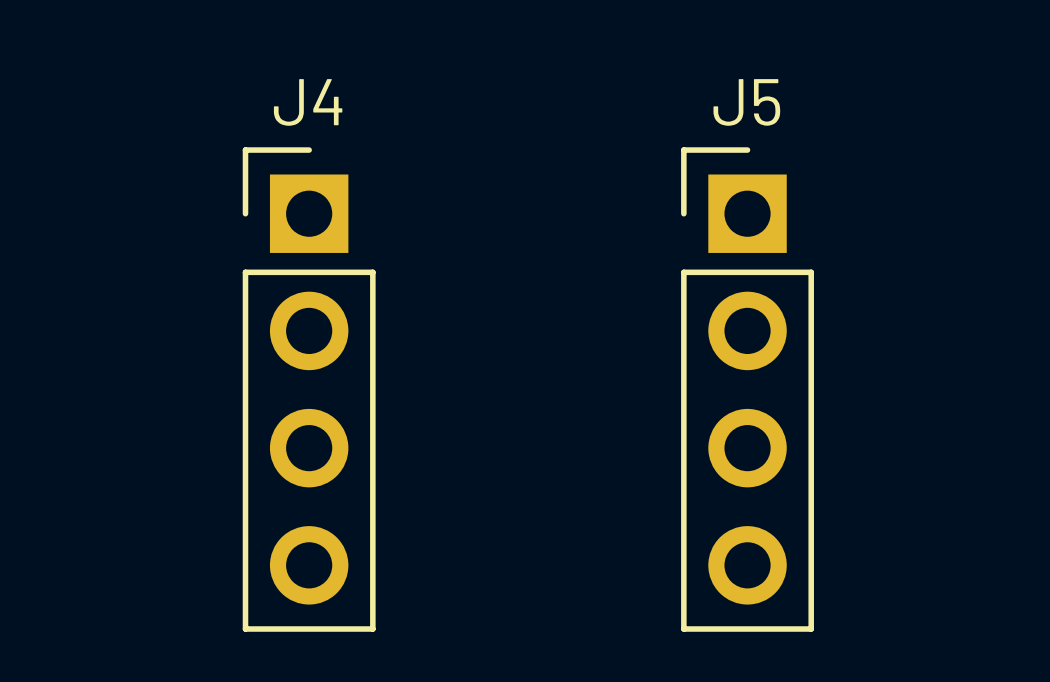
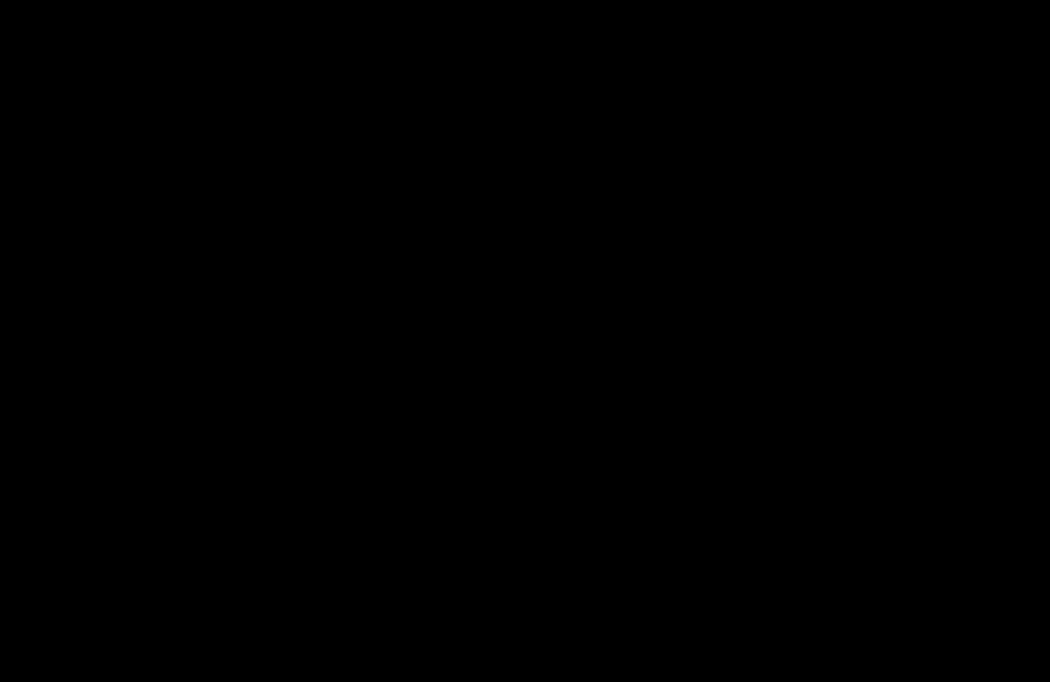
J4: (309, 389) -> none
J5: (747, 389) -> none

